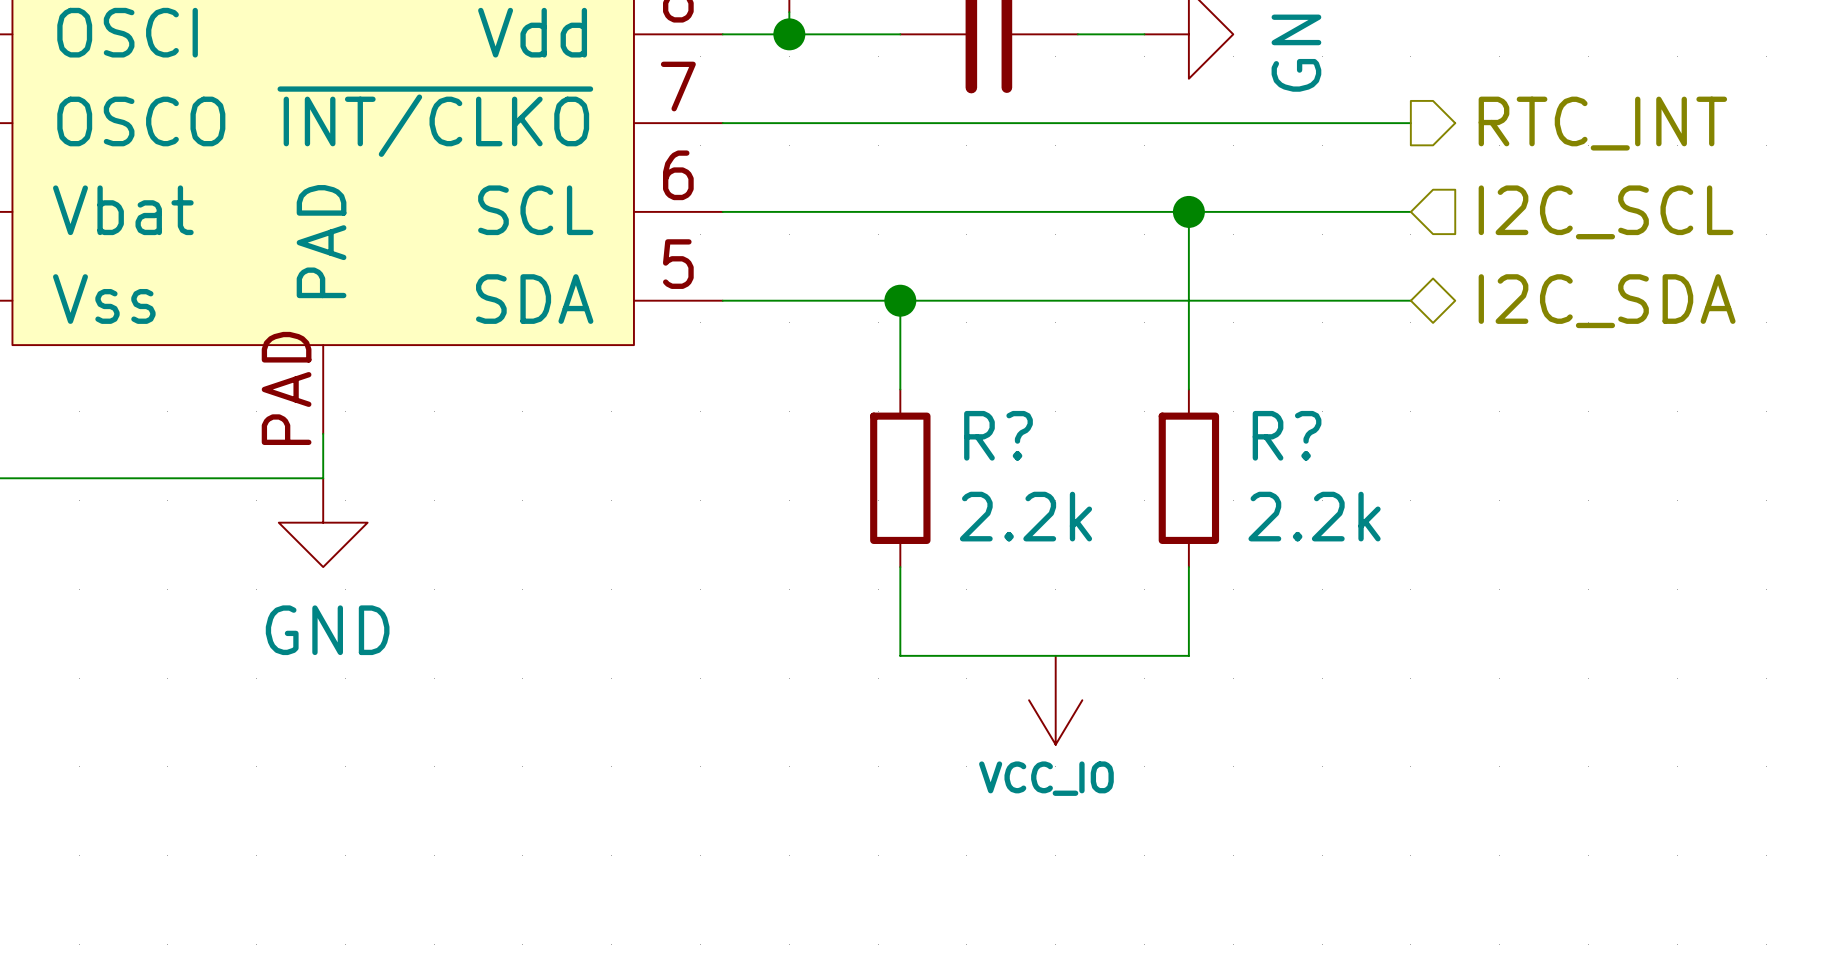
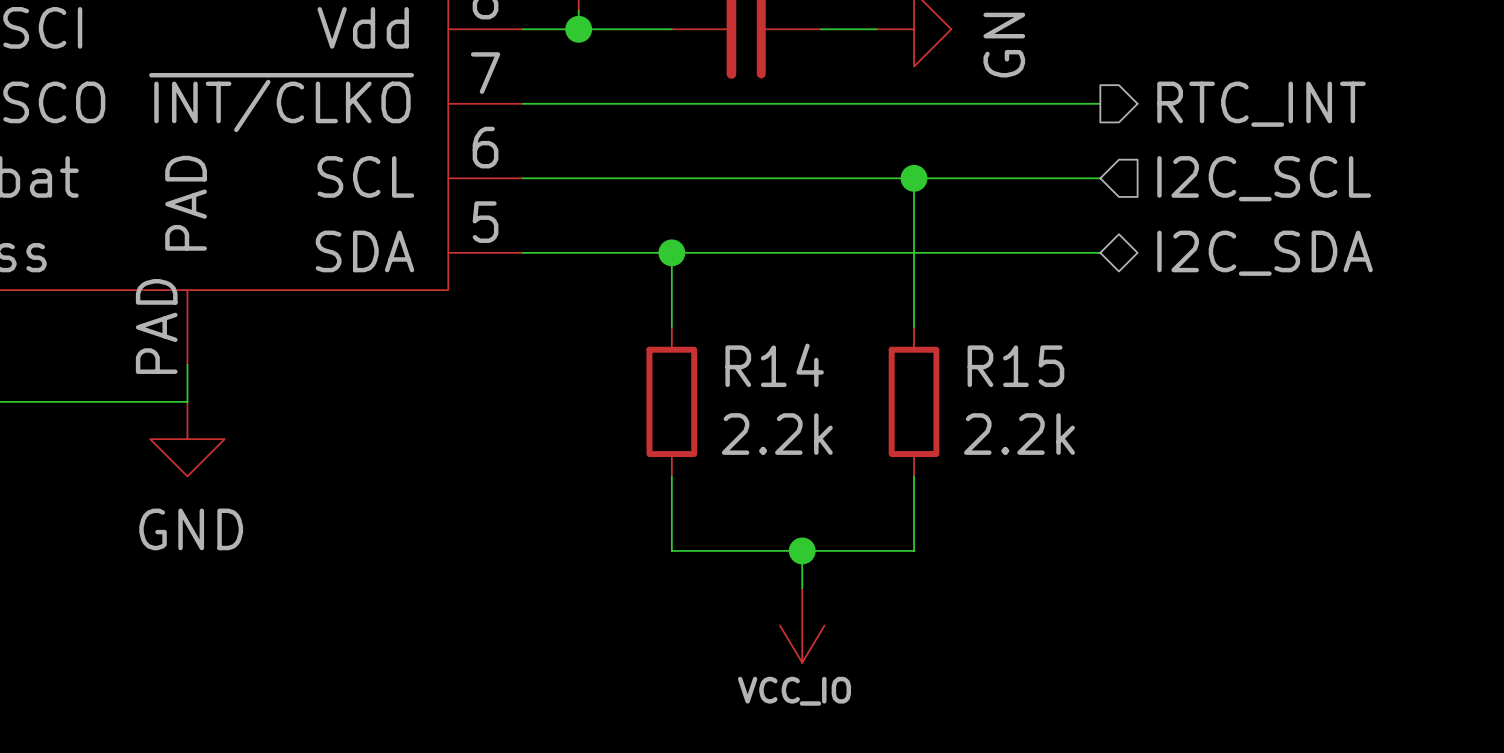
R? name: R? (998, 435) -> R14 (774, 365)
R? name: R? (1287, 435) -> R15 (1015, 366)
junction: none -> (802, 550)
power symbol position: VCC_IO (1055, 700) -> VCC_IO (802, 625)

